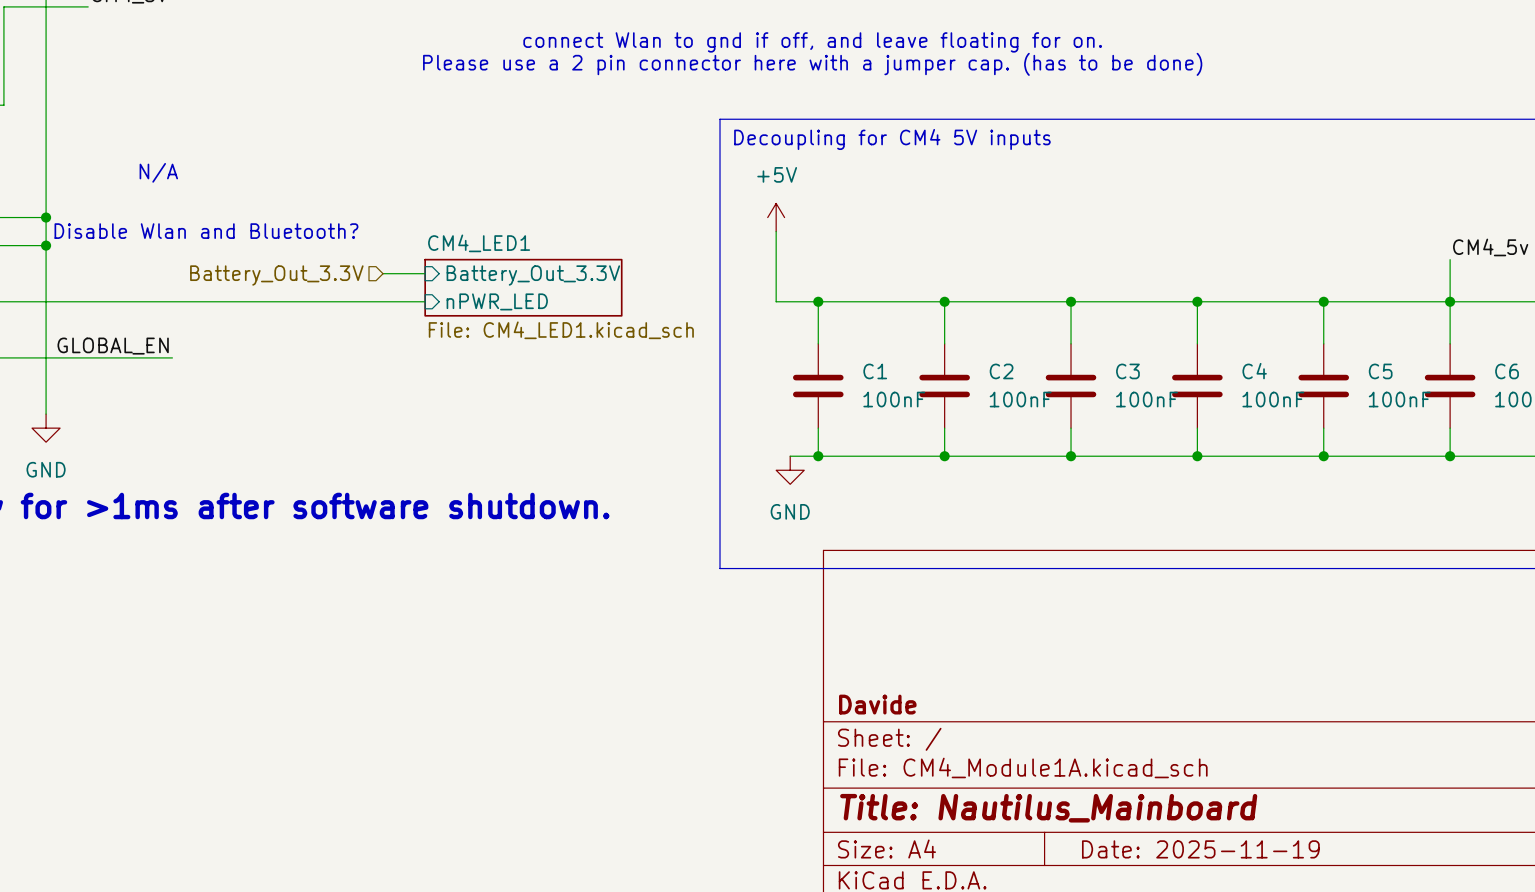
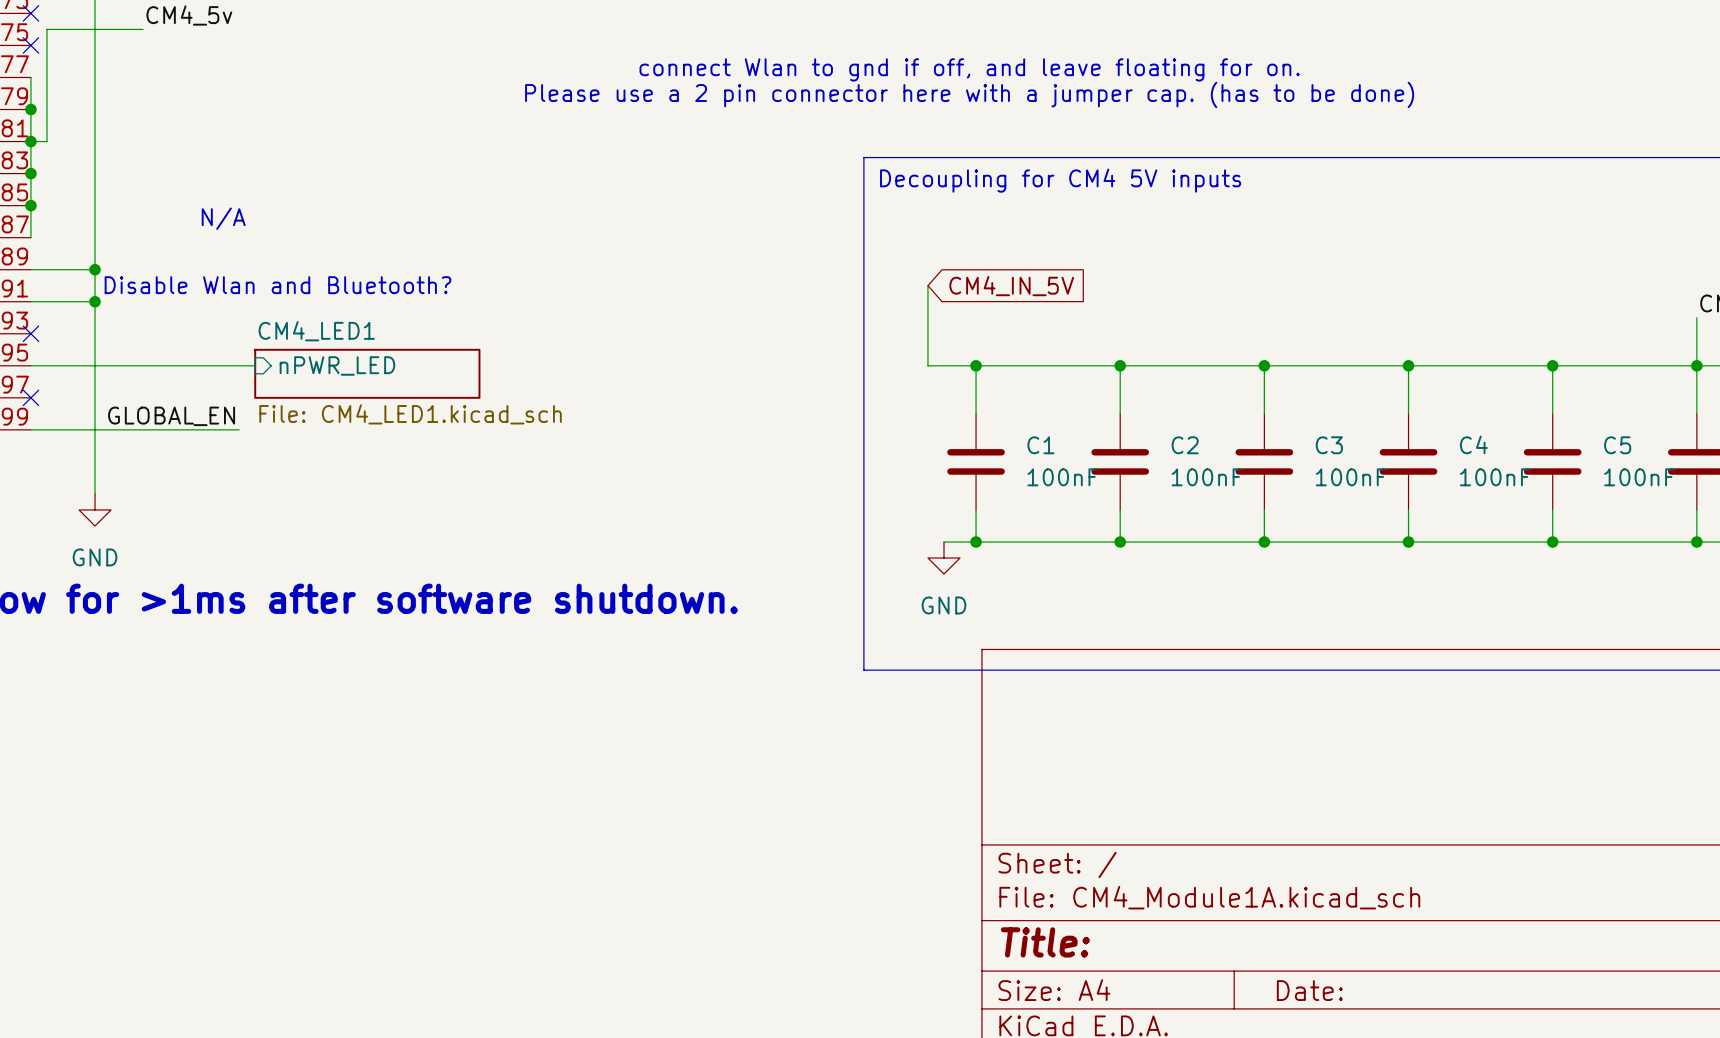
power symbol: +5V (776, 217) -> none
global label: none -> CM4_IN_5V (1011, 286)
sheet CM4_LED1 shape: [424, 258, 623, 317] -> [254, 348, 481, 399]
wire: (383, 273) (425, 273) -> none
hierarchical label: Battery_Out_3.3V (276, 275) -> none
sheet pin: Battery_Out_3.3V (533, 275) -> none
wire: (186, 301) (425, 301) -> none
sheet pin position: nPWR_LED (497, 301) -> nPWR_LED (337, 365)
title block: Davide (877, 704) -> none
title block: Title: Nautilus_Mainboard (1048, 808) -> Title: (1045, 942)
title block: Date: 2025-11-19 (1200, 849) -> Date: (1309, 990)

